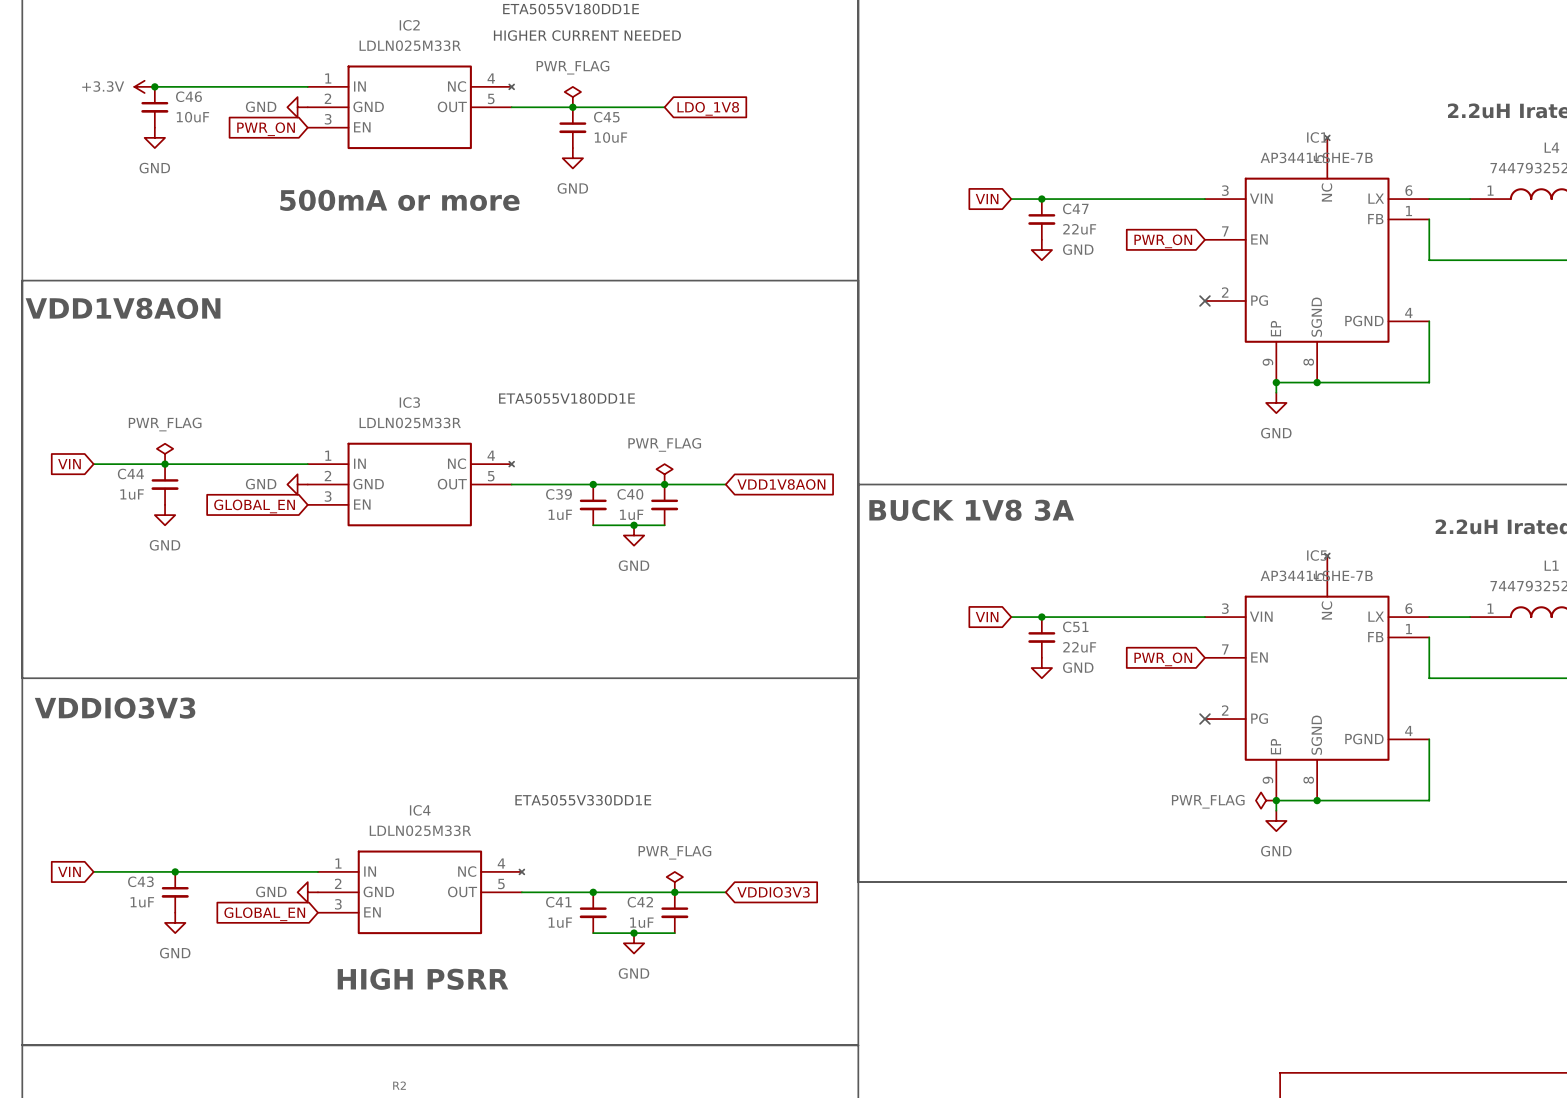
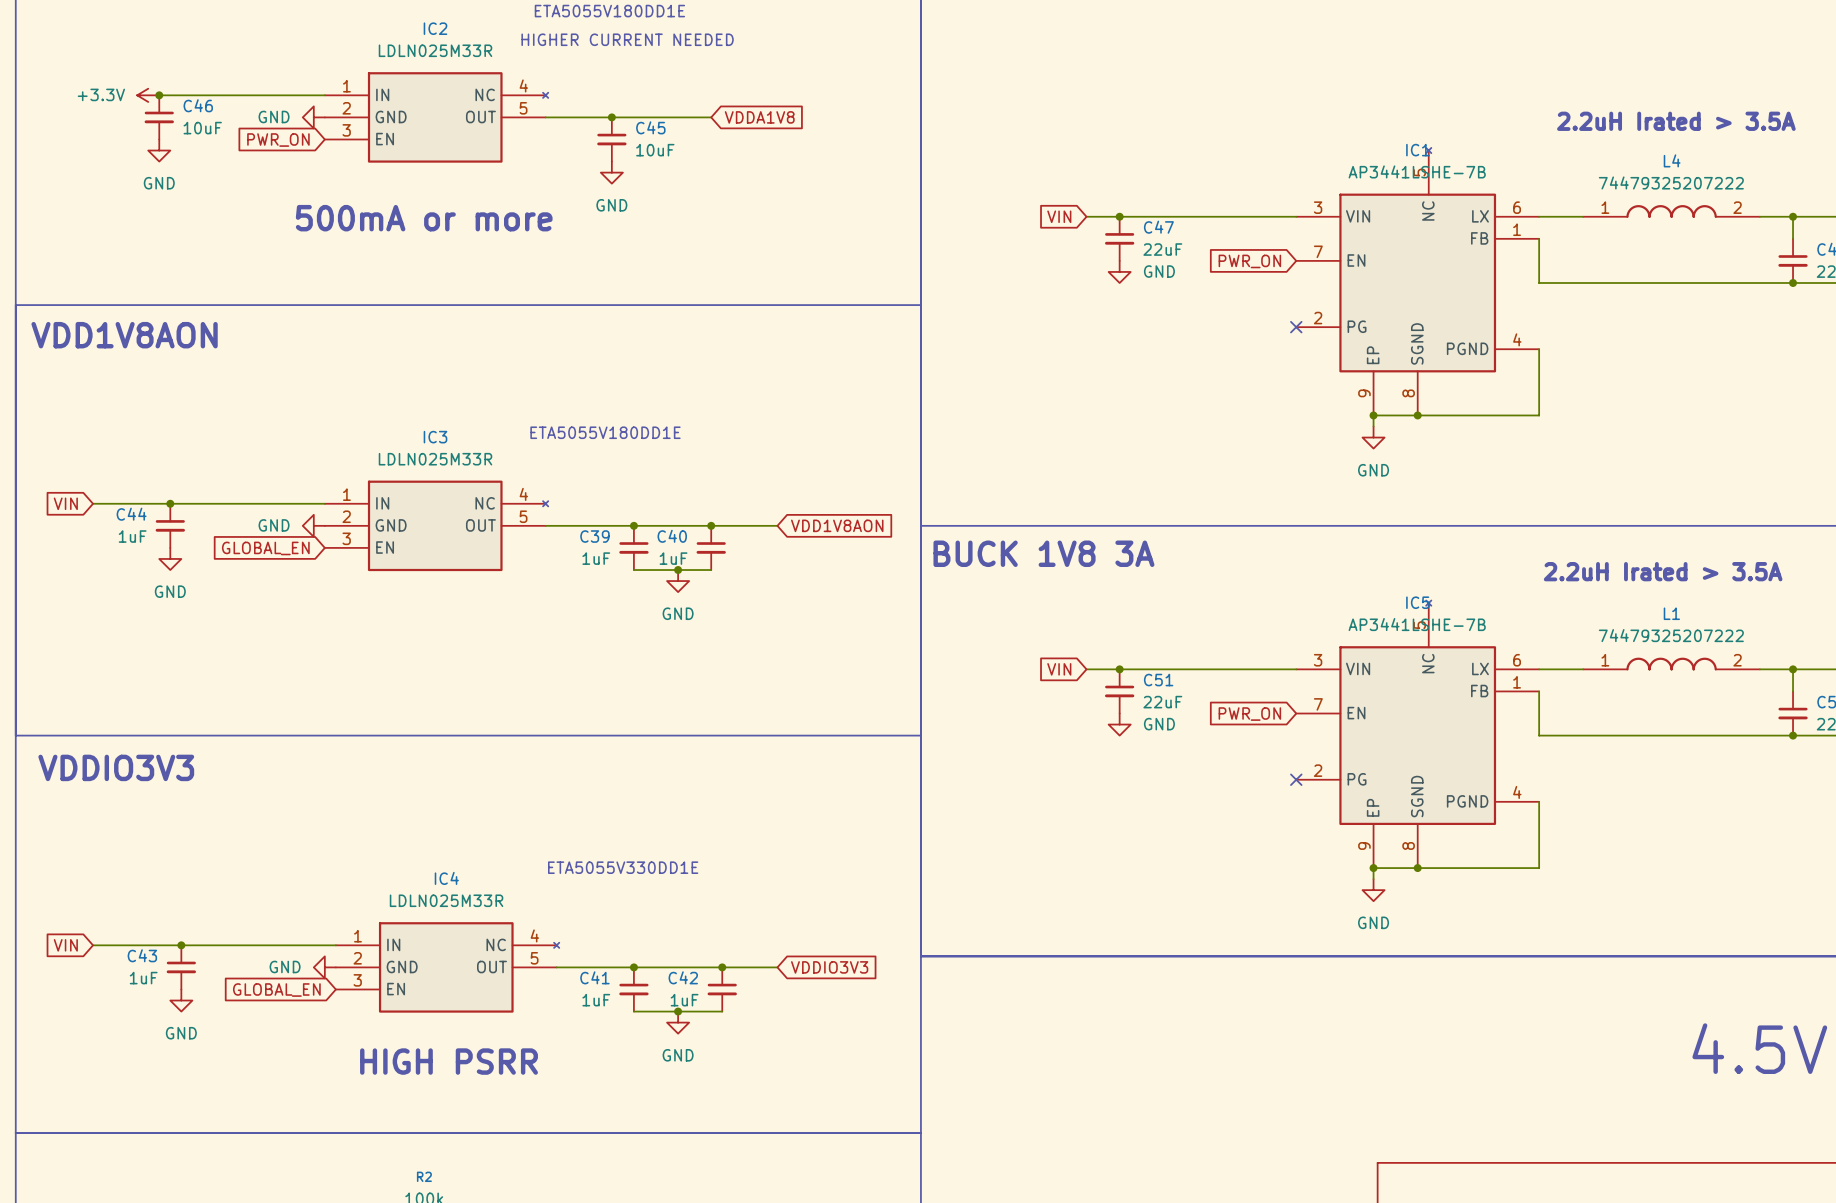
power symbol: PWR_FLAG (572, 97) -> none
global label: LDO_1V8 (708, 108) -> VDDA1V8 (759, 117)
power symbol: PWR_FLAG (165, 453) -> none
power symbol: PWR_FLAG (664, 474) -> none
power symbol: PWR_FLAG (1266, 800) -> none
power symbol: PWR_FLAG (674, 882) -> none

